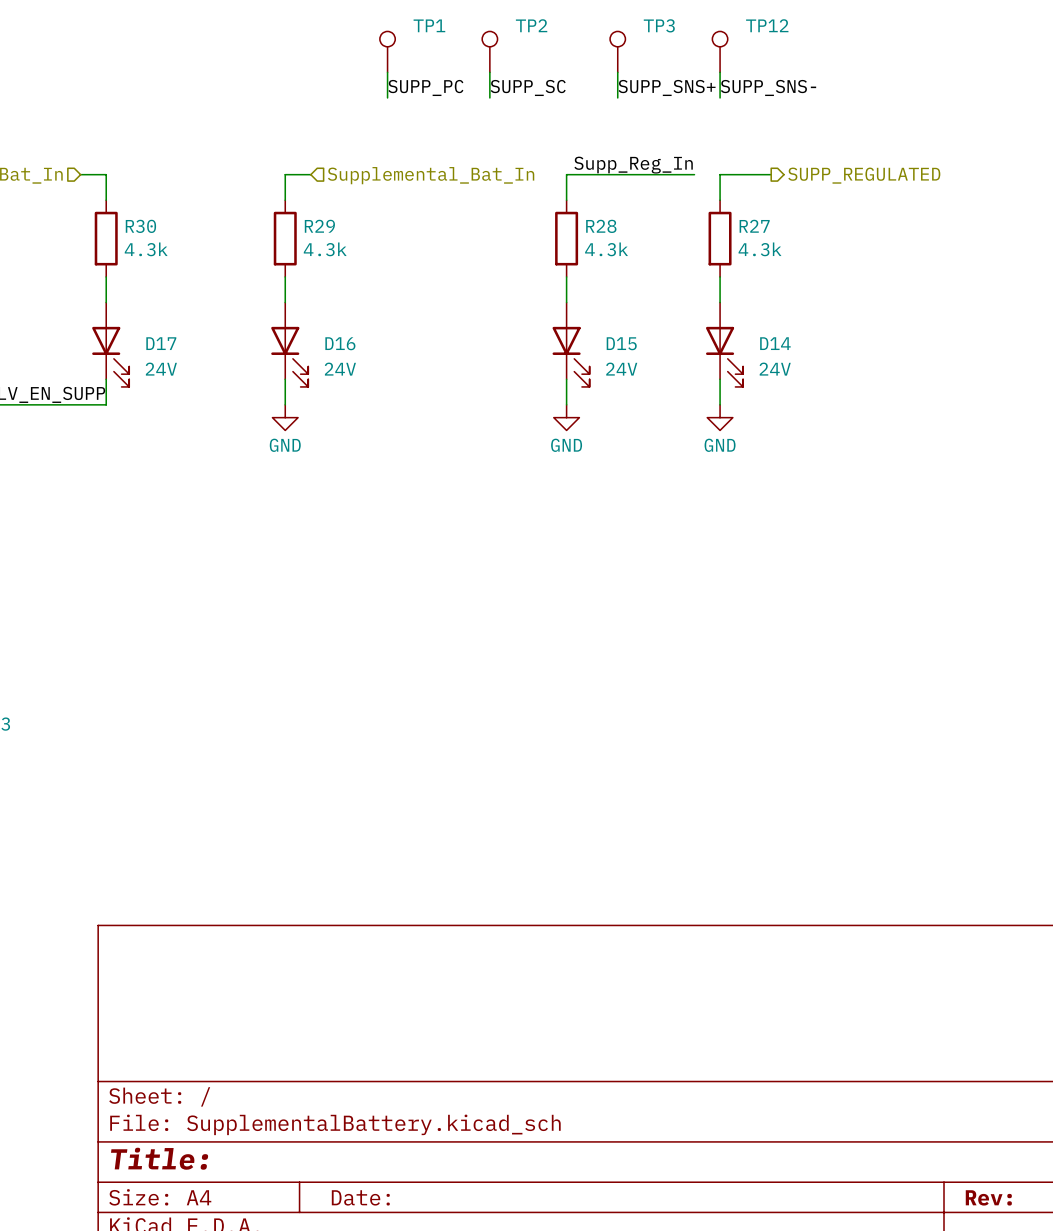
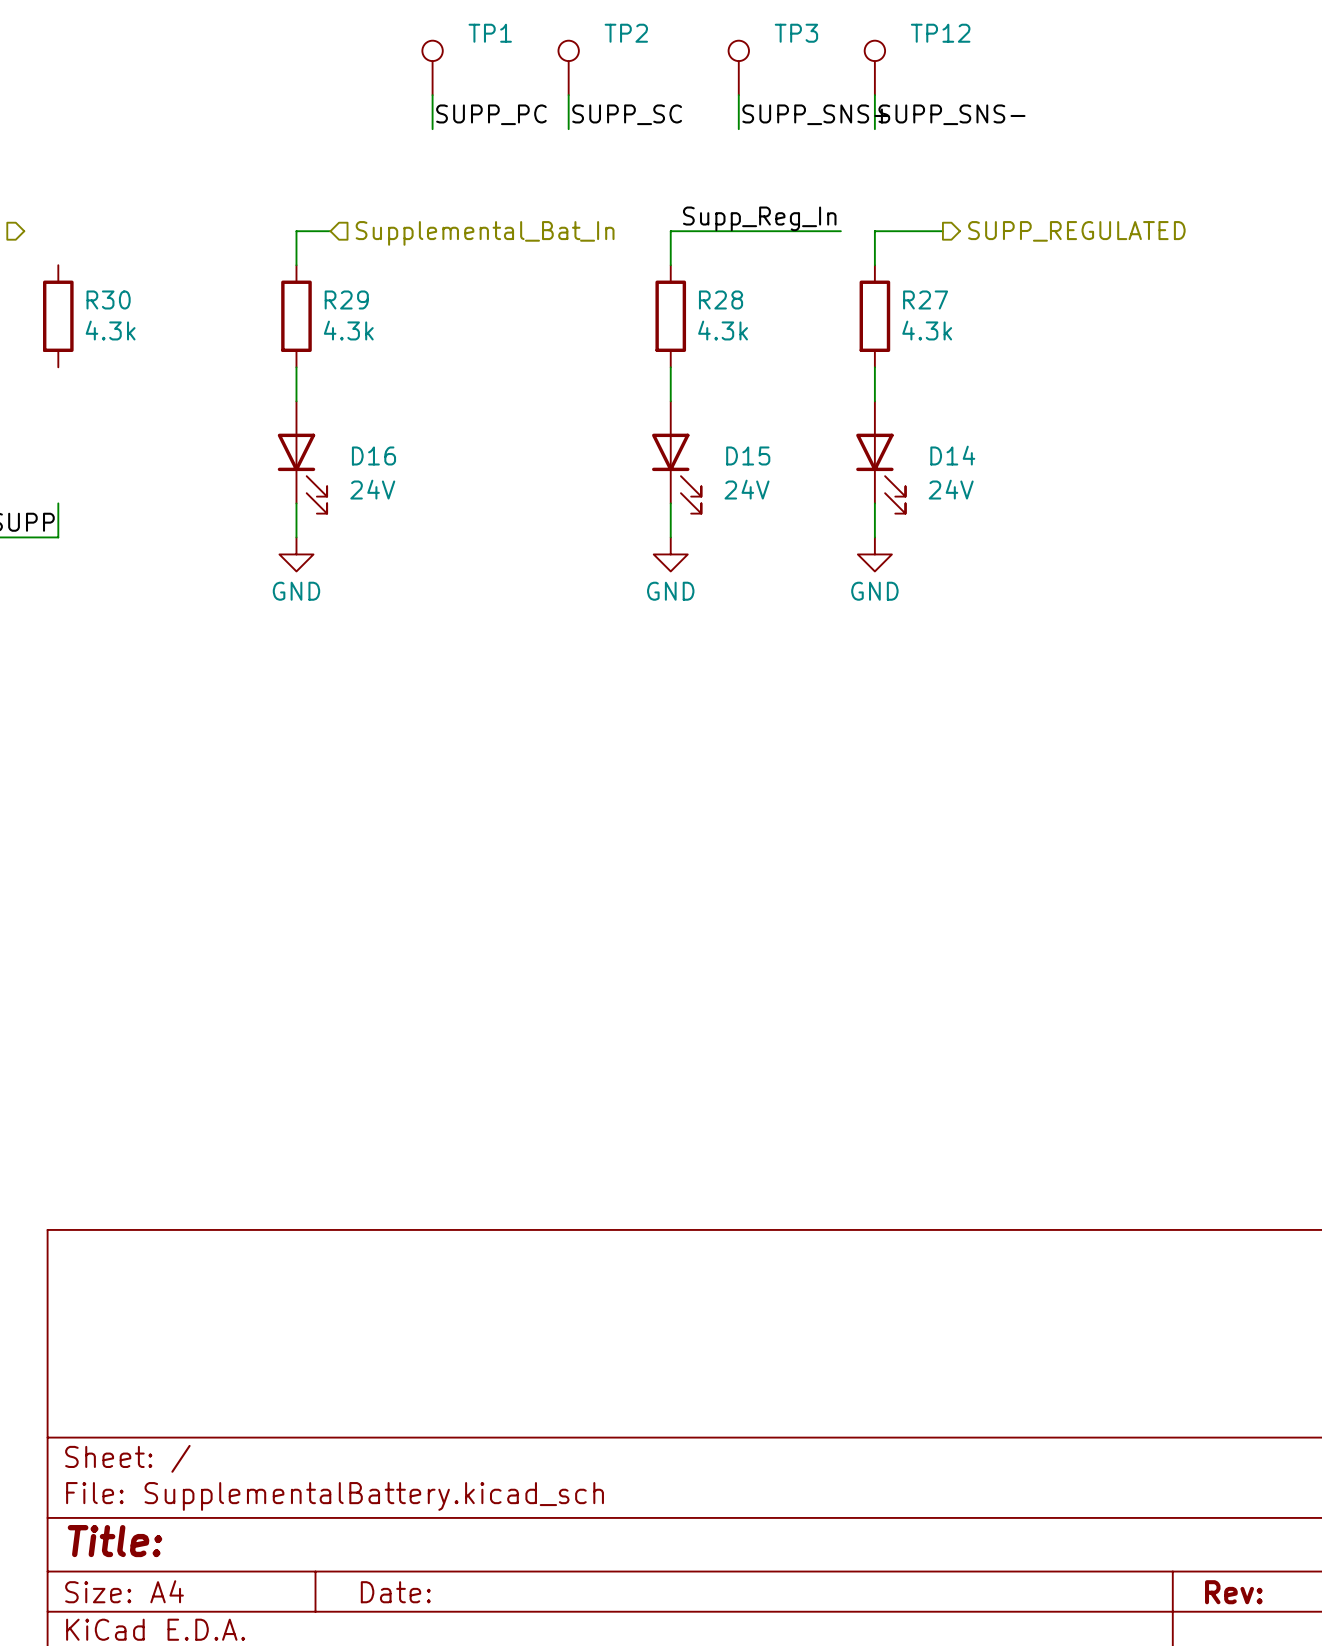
wire: (80, 174) (106, 174) (106, 200) -> none
wire: (106, 276) (106, 302) -> none
D17: 24V (110, 344) -> none

